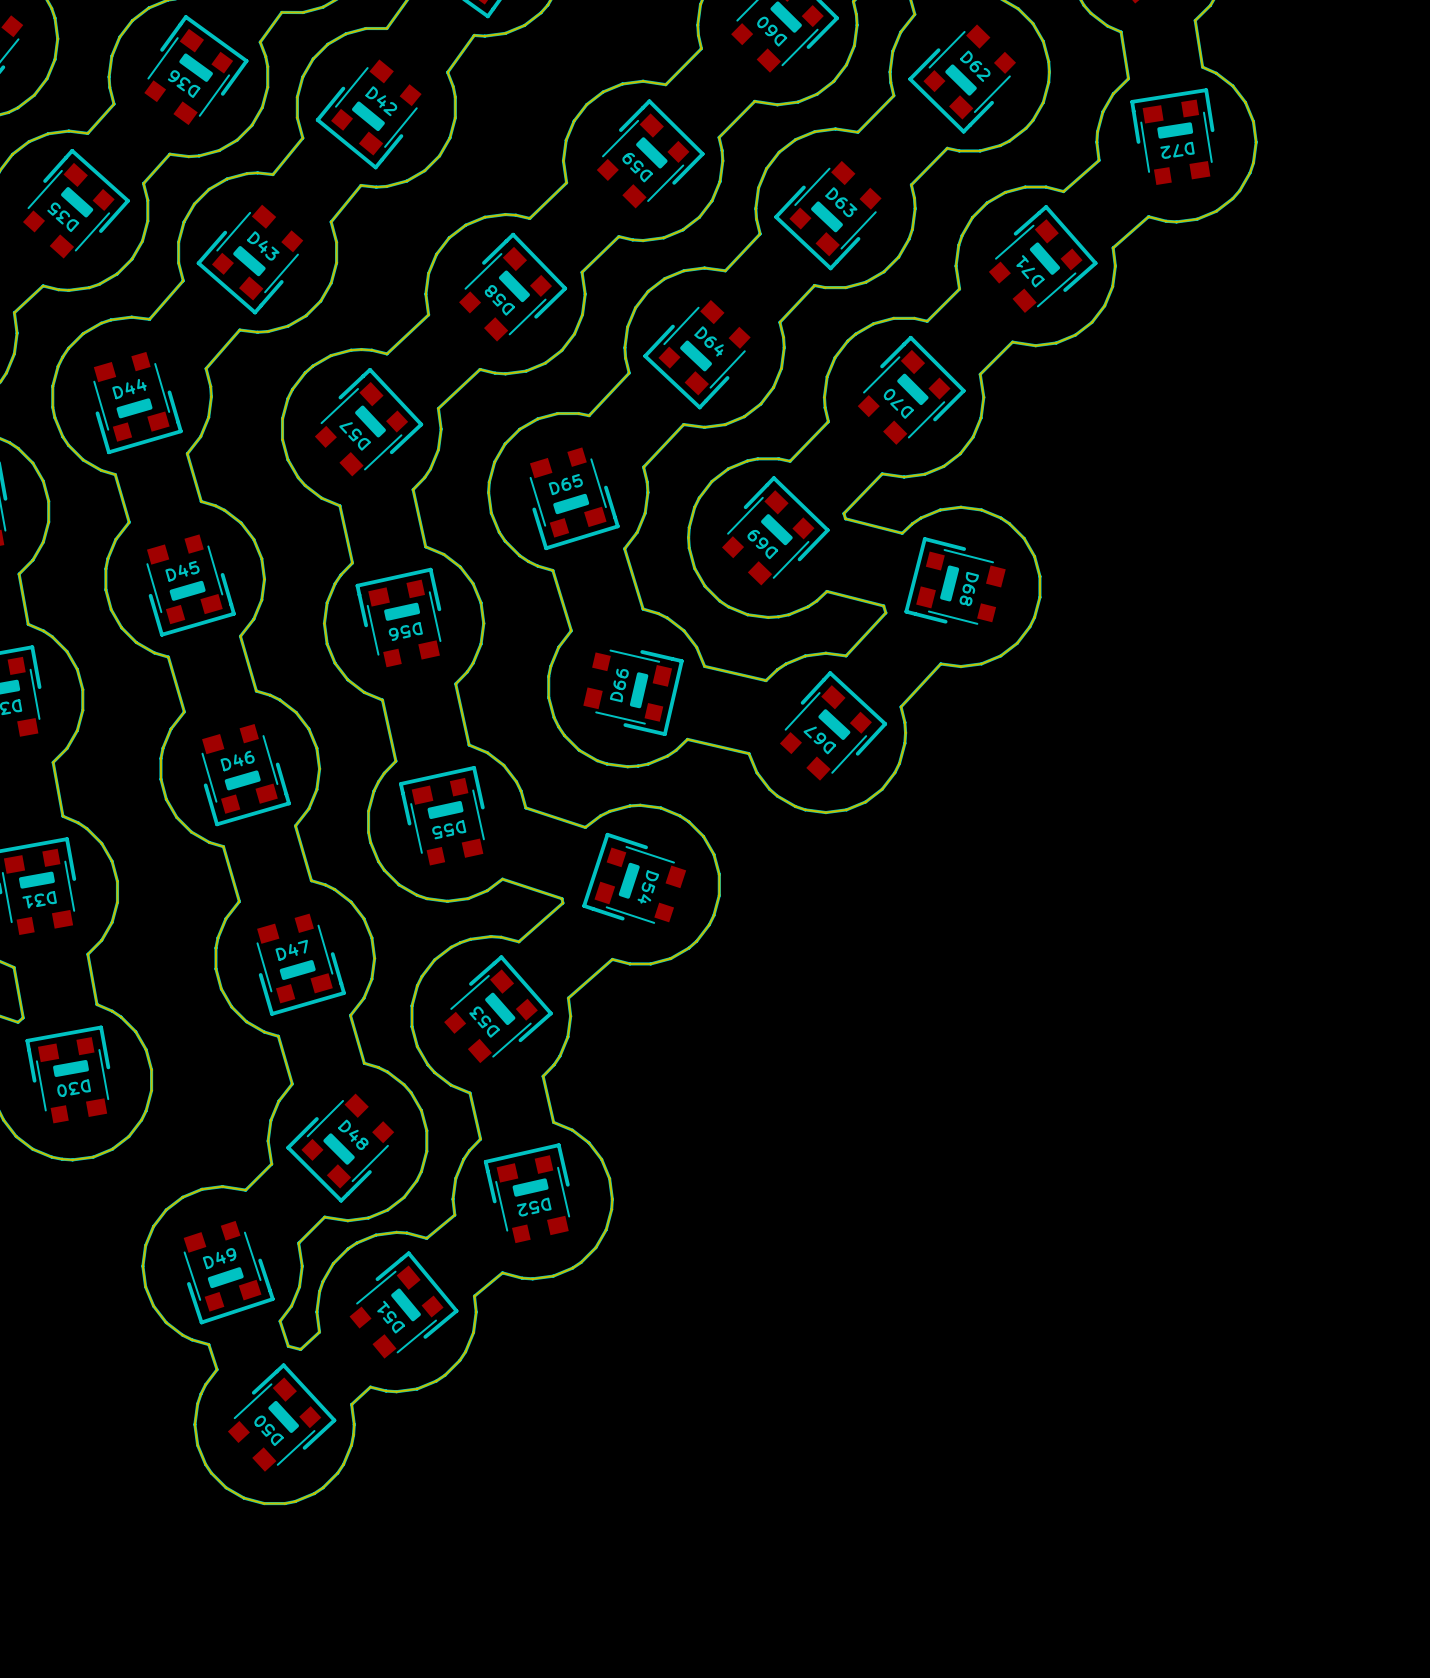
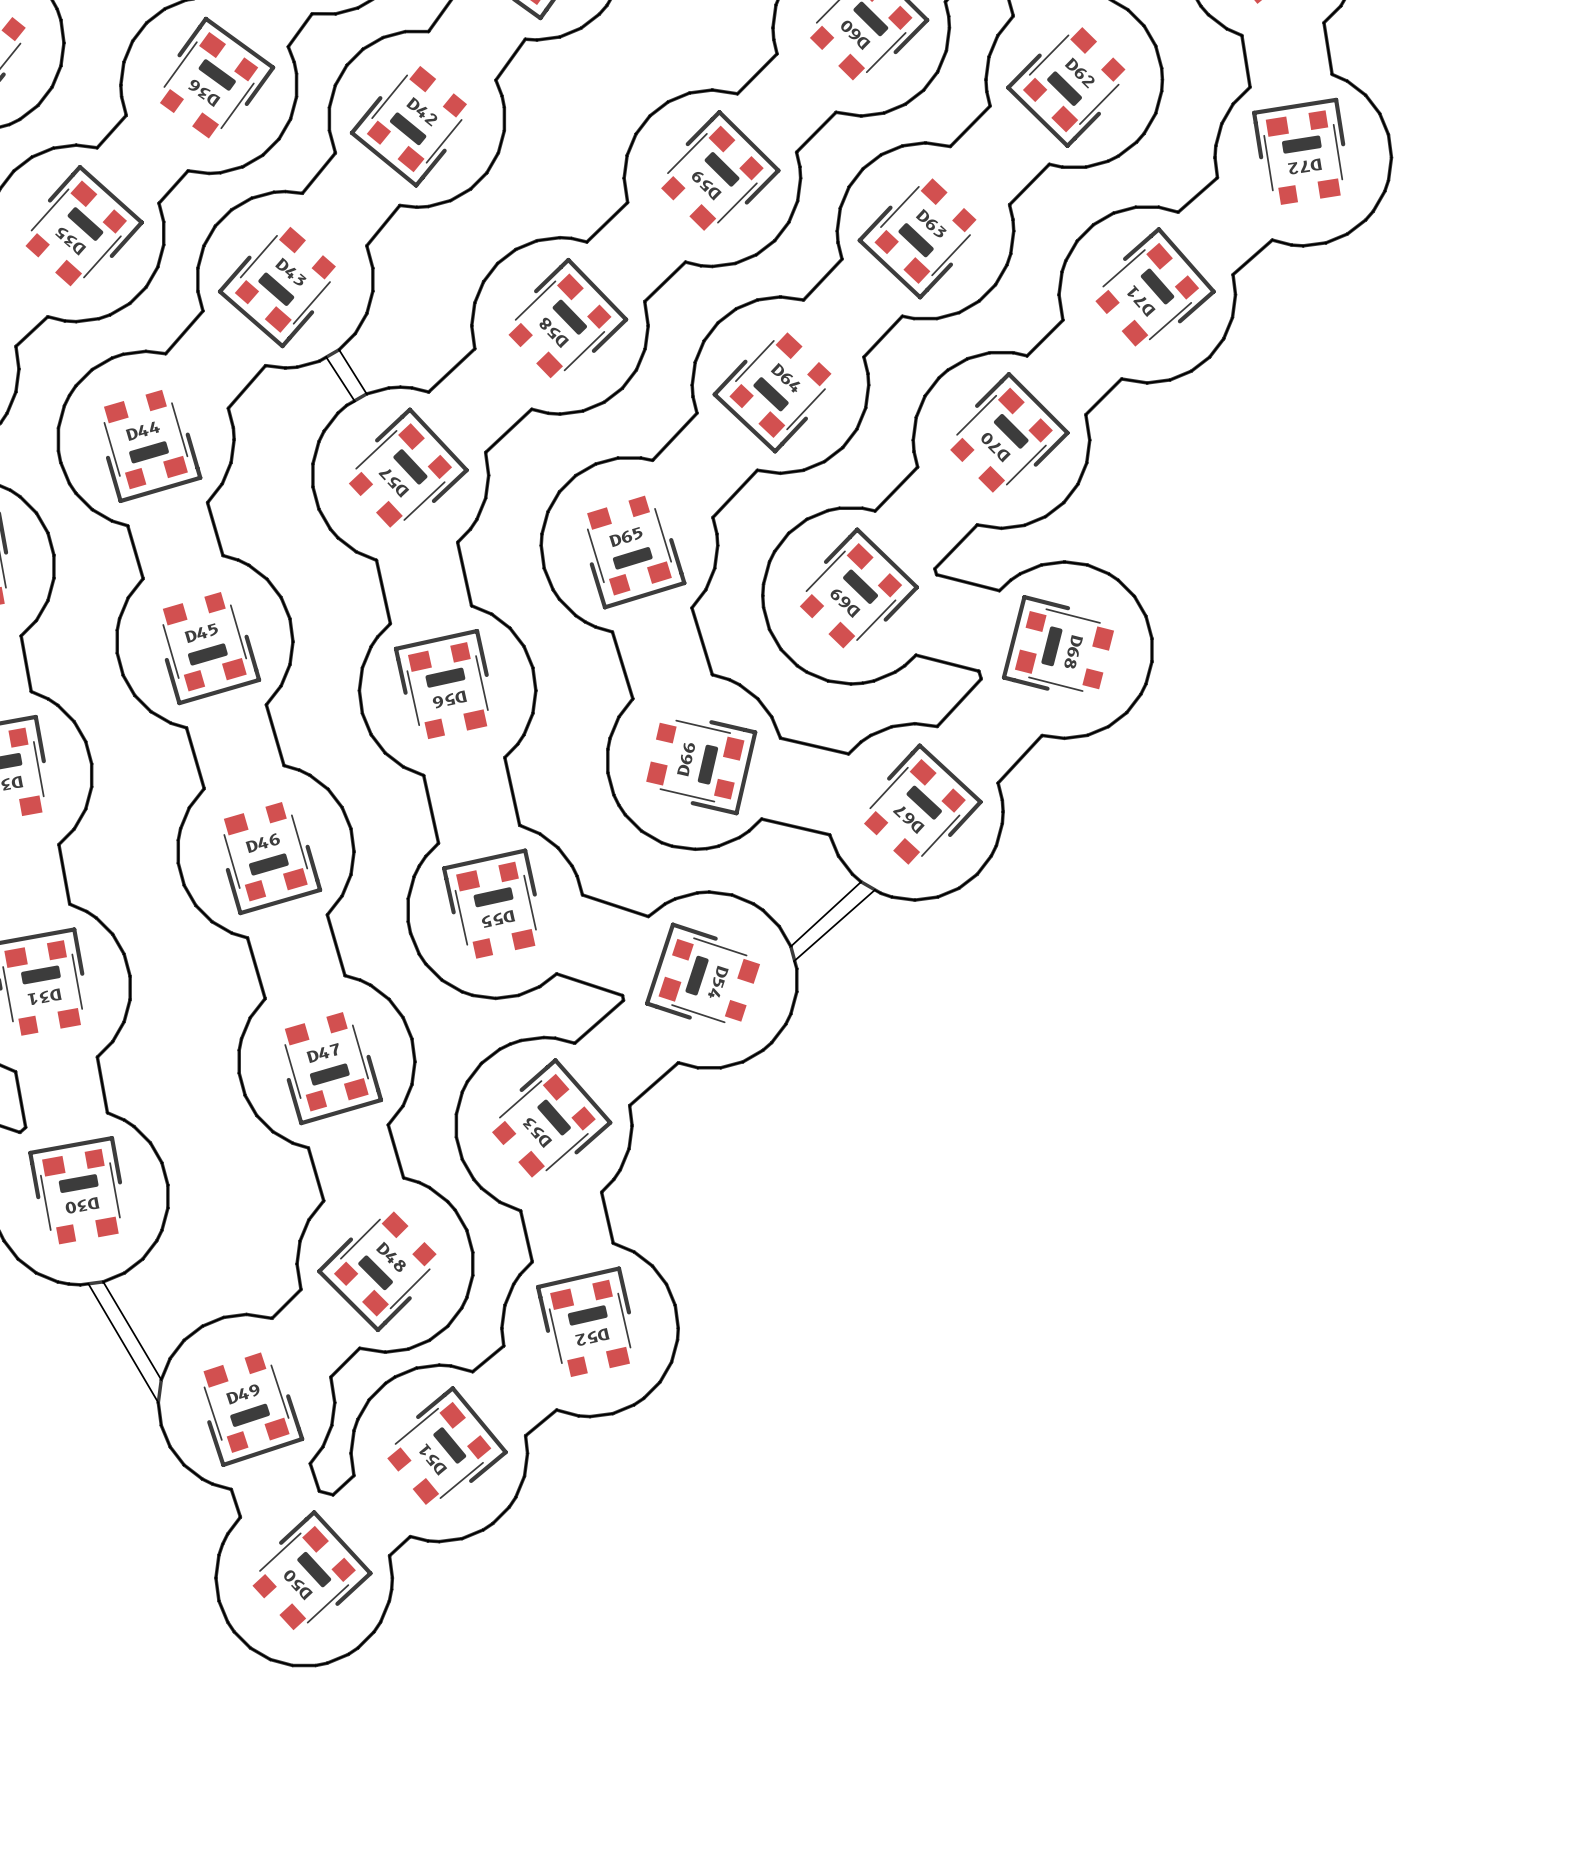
board edge: (306, 315) (288, 326) -> (346, 405) (354, 401) (326, 357) (319, 361)
board edge: (331, 355) (313, 366) -> (366, 393) (339, 349)
board edge: (777, 796) (795, 806) -> (861, 881) (790, 946)
board edge: (713, 854) (719, 874) -> (881, 893) (874, 890) (794, 961) (796, 968)
board edge: (93, 1157) (72, 1159) -> (103, 1281) (161, 1379)
board edge: (145, 1245) (142, 1266) -> (80, 1284) (88, 1283) (158, 1402)

